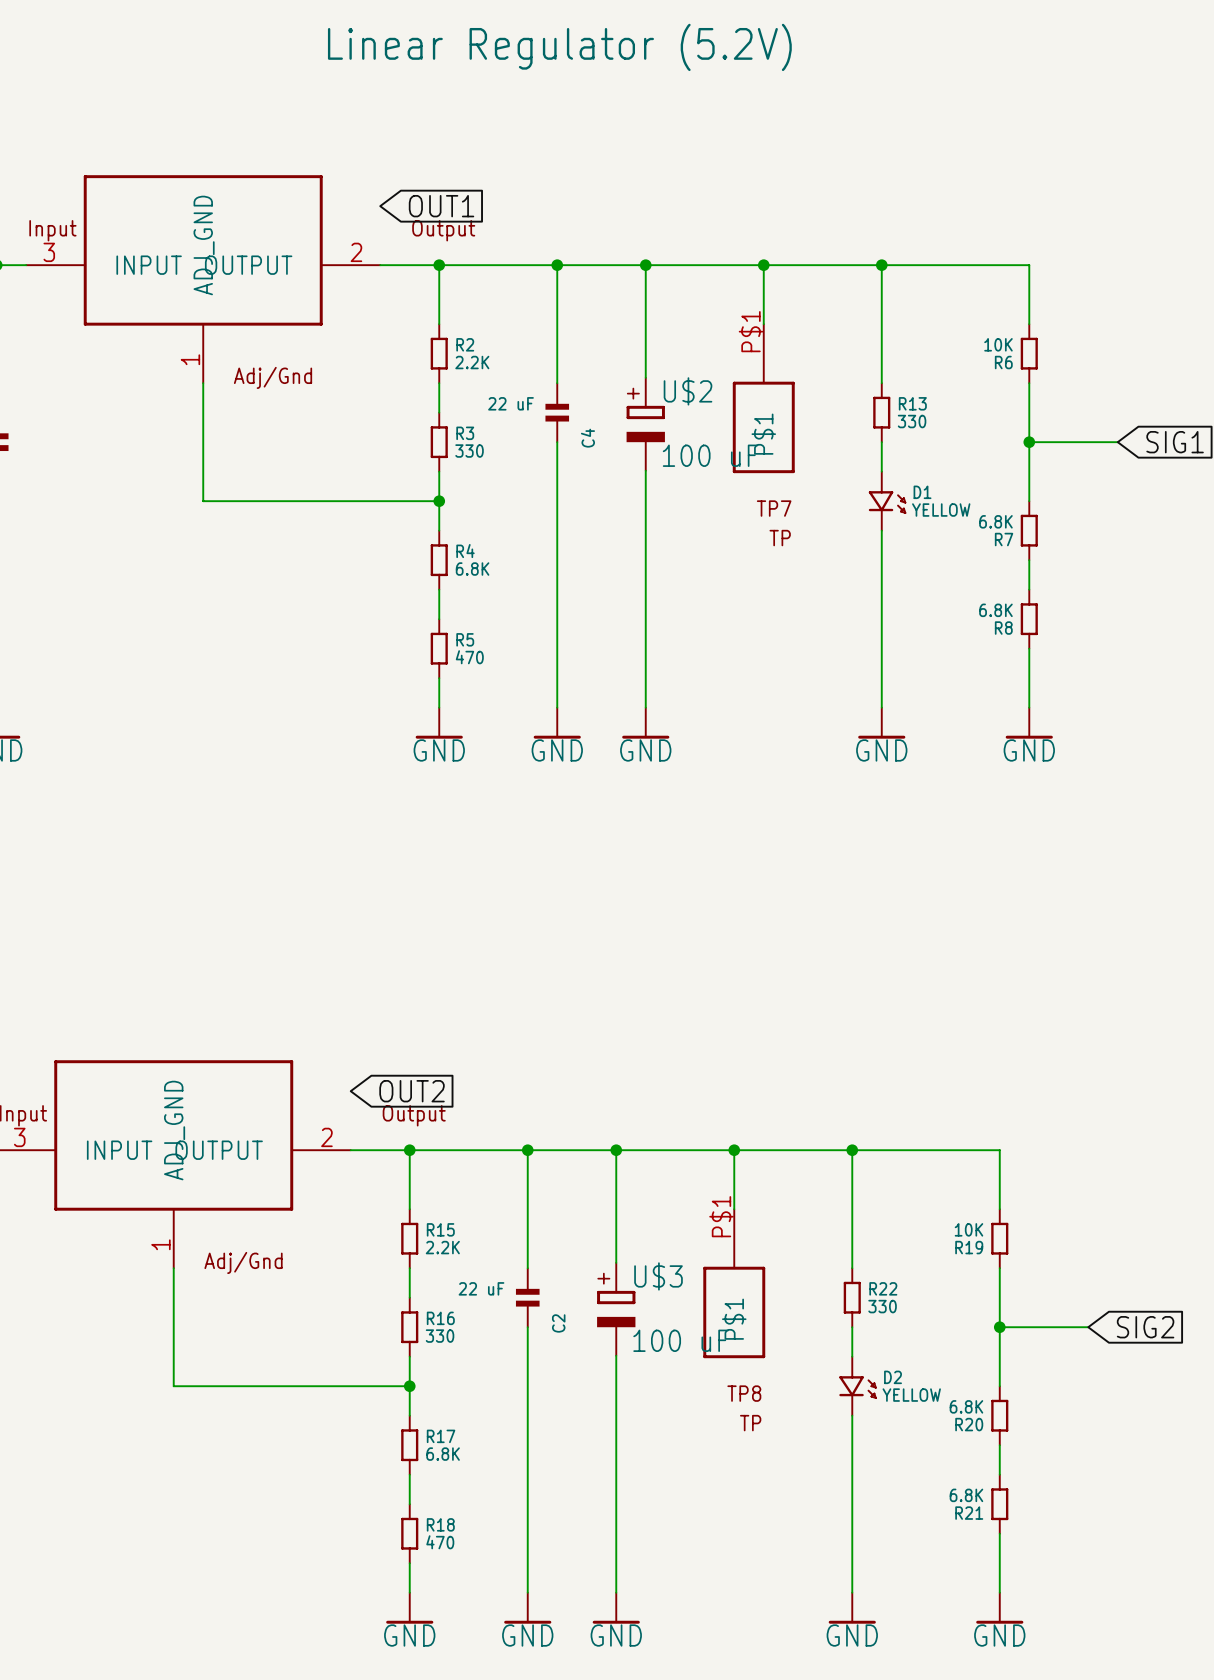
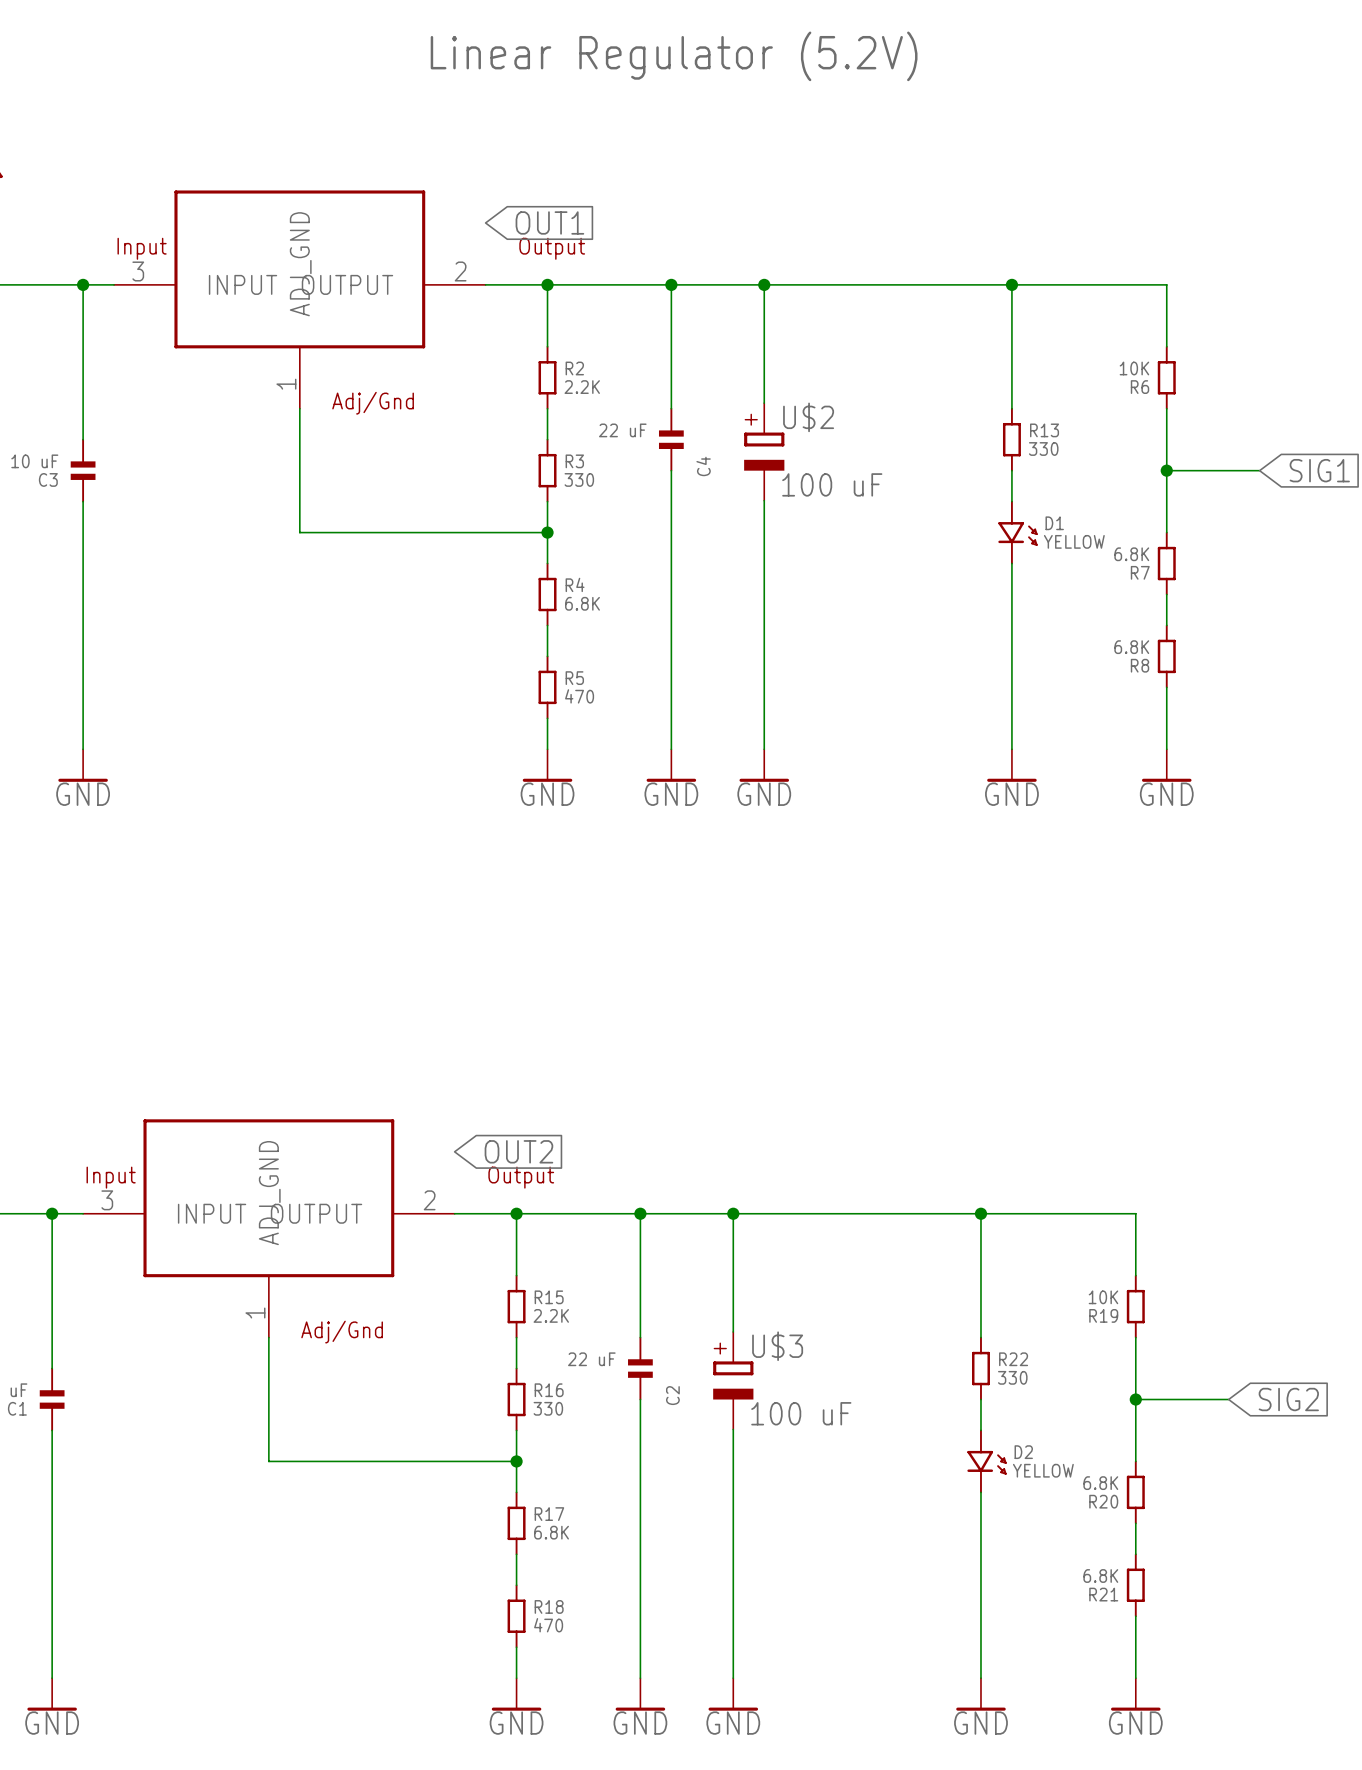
wire: (763, 265) (763, 324) -> none
junction: (763, 265) -> none
TP7: TP (763, 398) -> none
wire: (734, 1150) (734, 1209) -> none
junction: (734, 1150) -> none
TP8: TP (734, 1283) -> none

